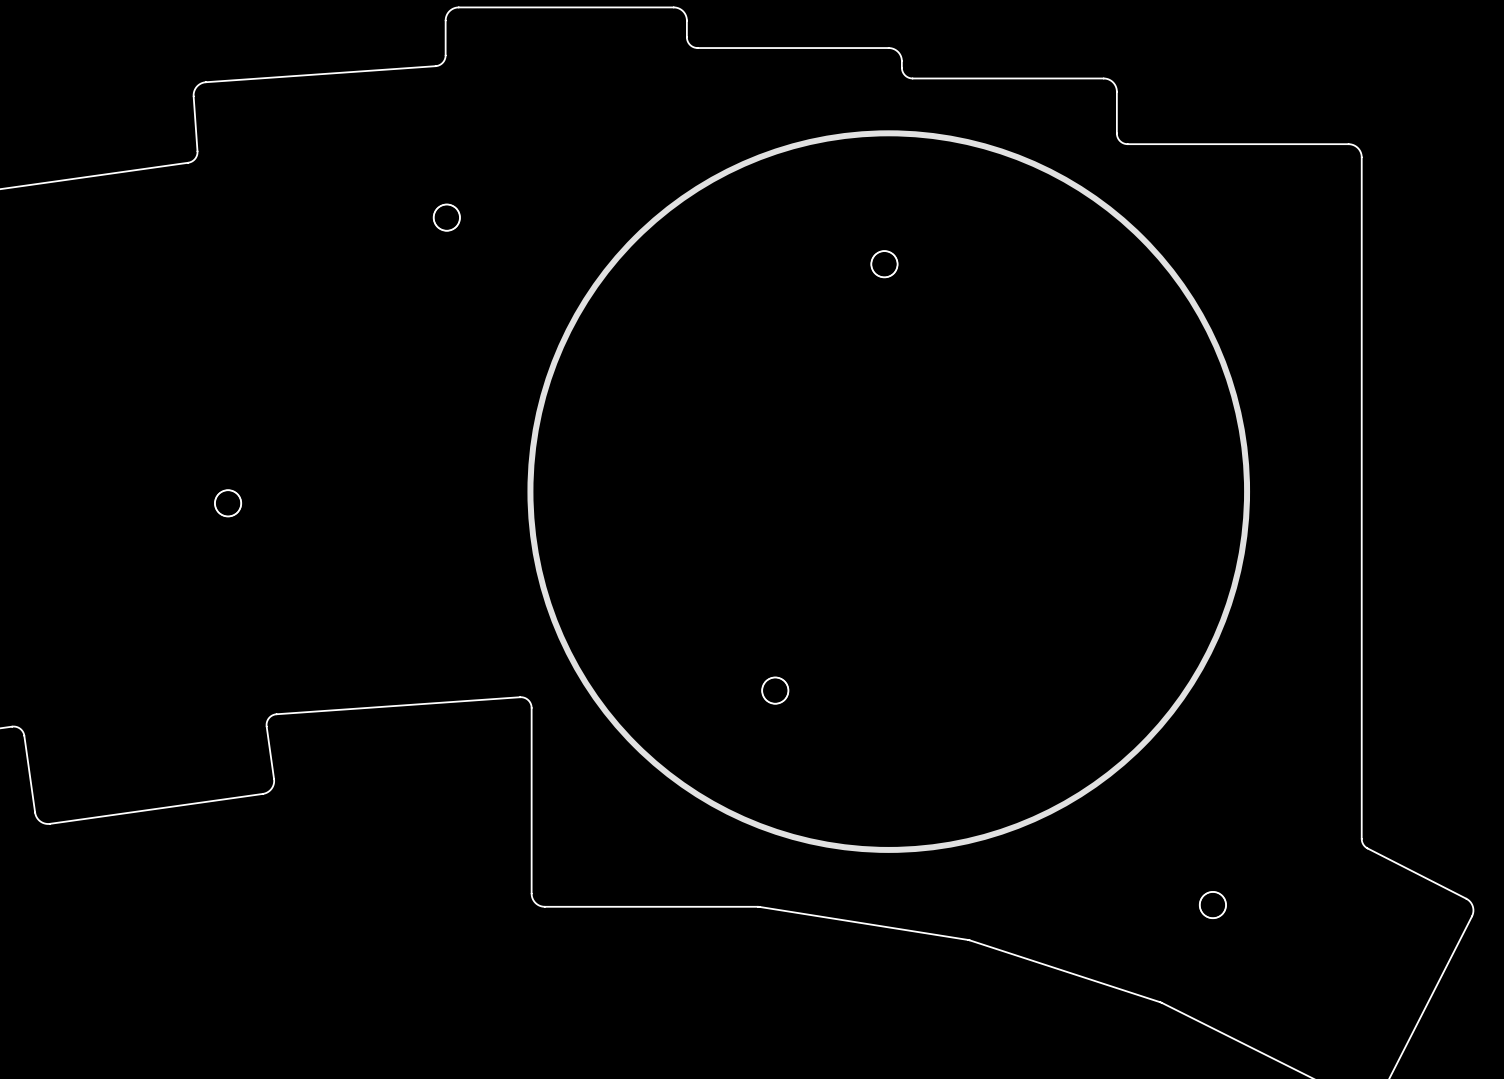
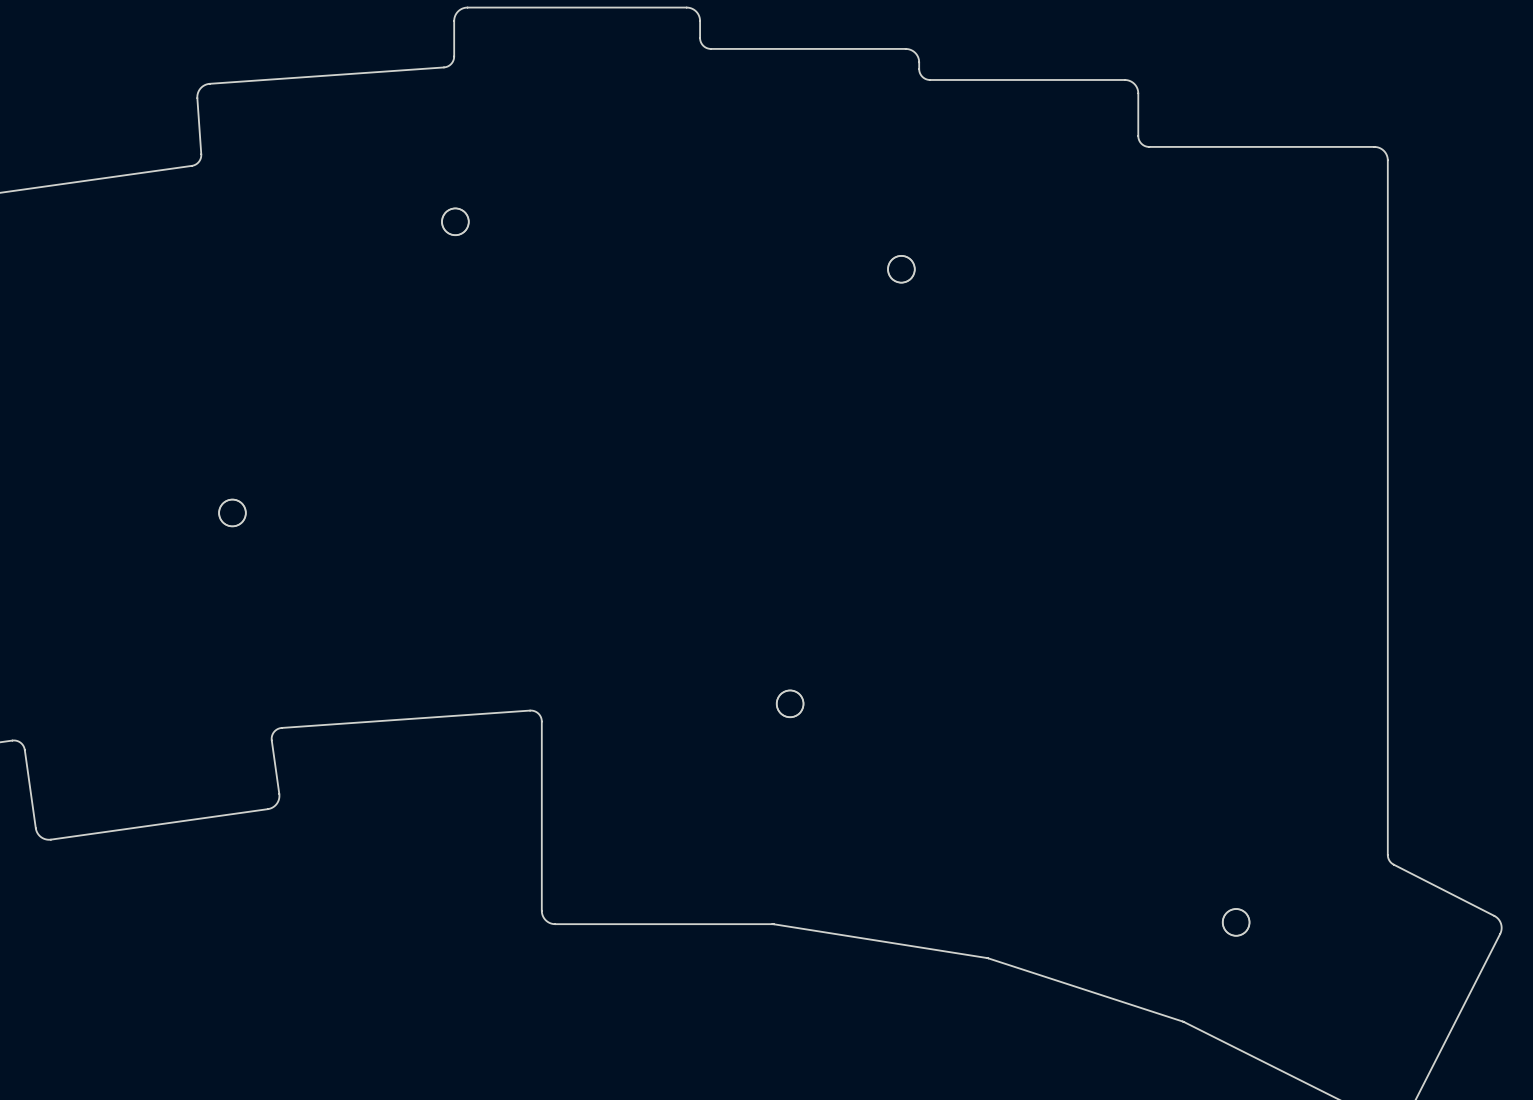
drawing: [527, 130, 1251, 853] -> none

